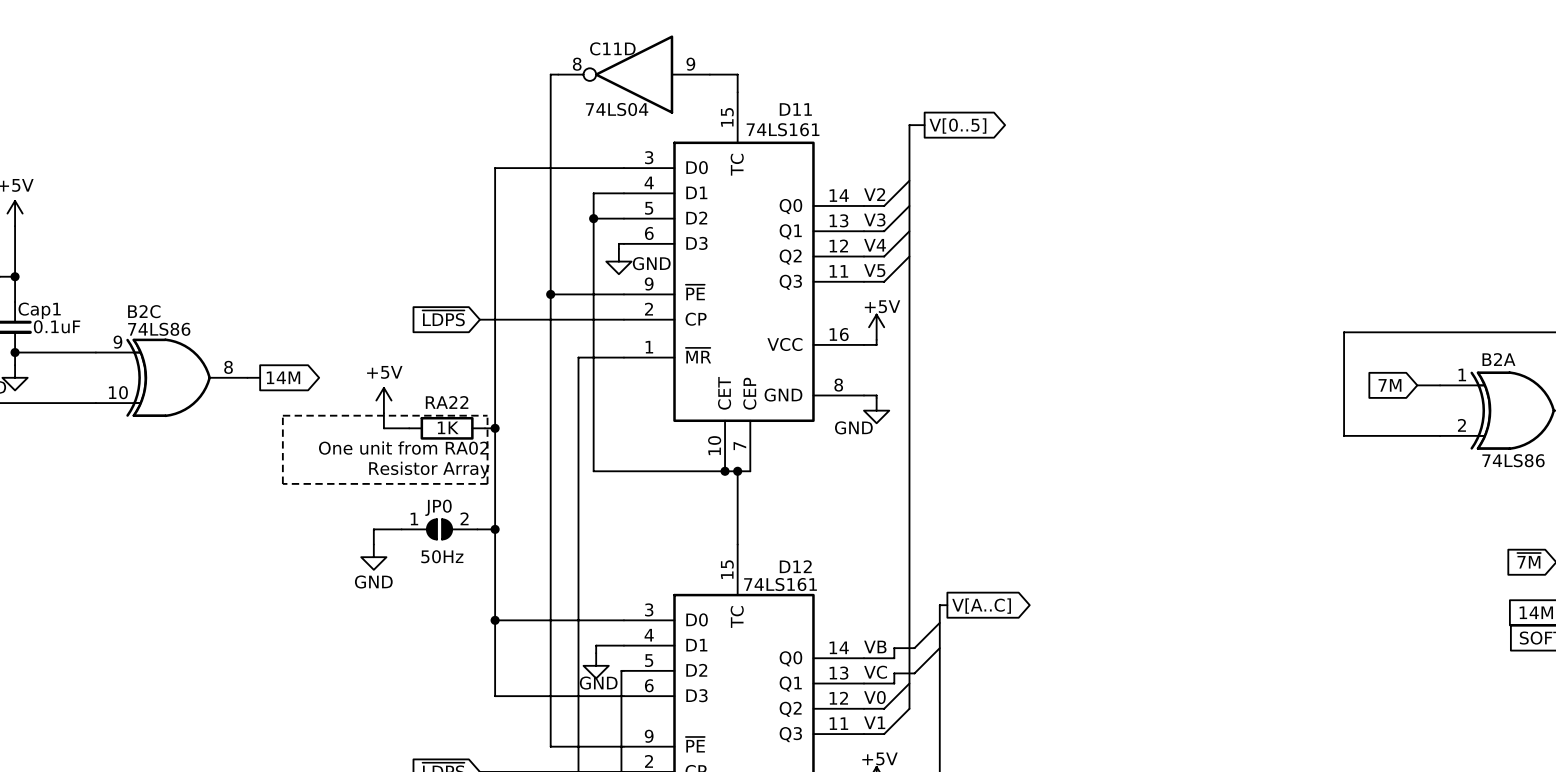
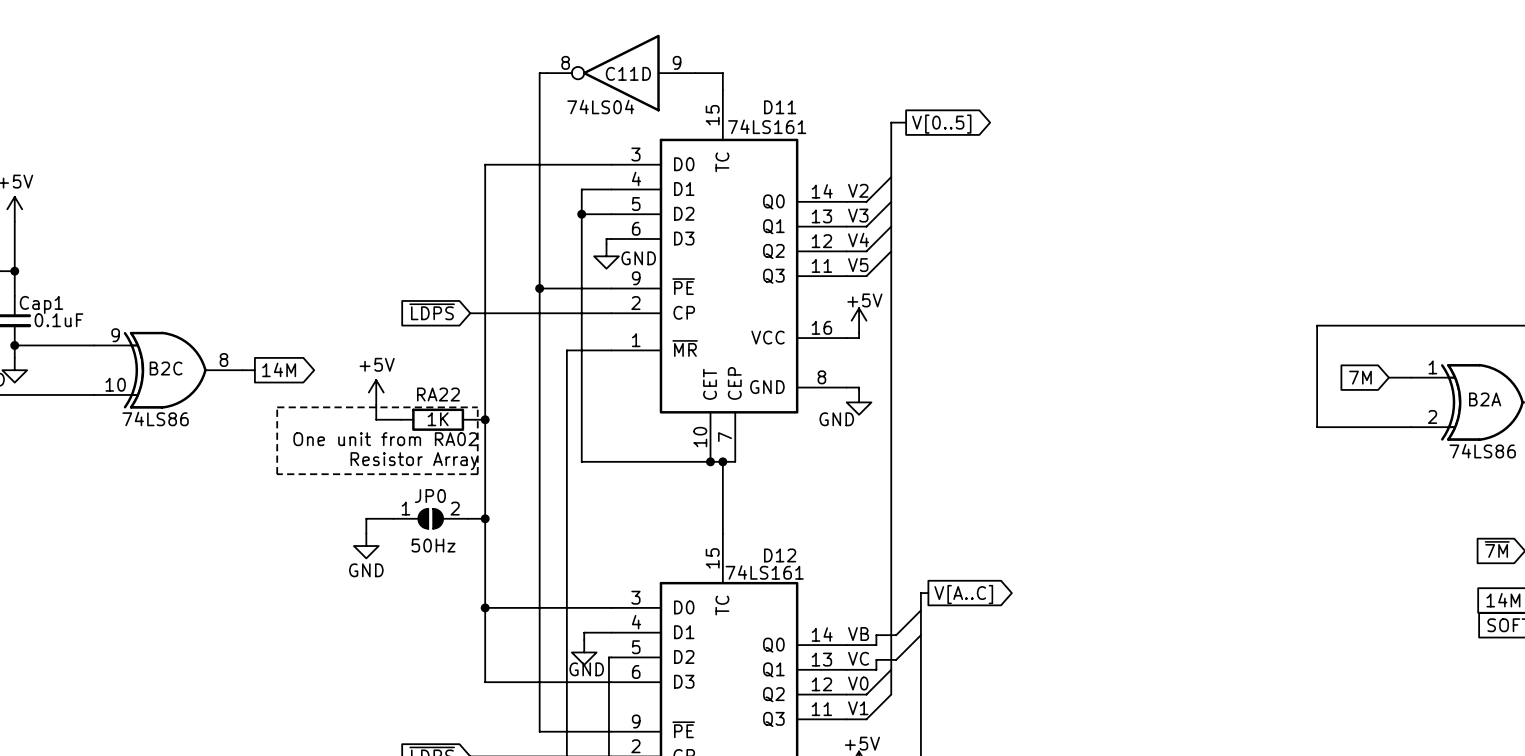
C11D name position: C11D (612, 48) -> C11D (628, 73)
B2C name position: B2C (144, 311) -> B2C (166, 368)
B2C value position: 74LS86 (159, 329) -> 74LS86 (155, 418)
B2A name position: B2A (1498, 359) -> B2A (1485, 399)

